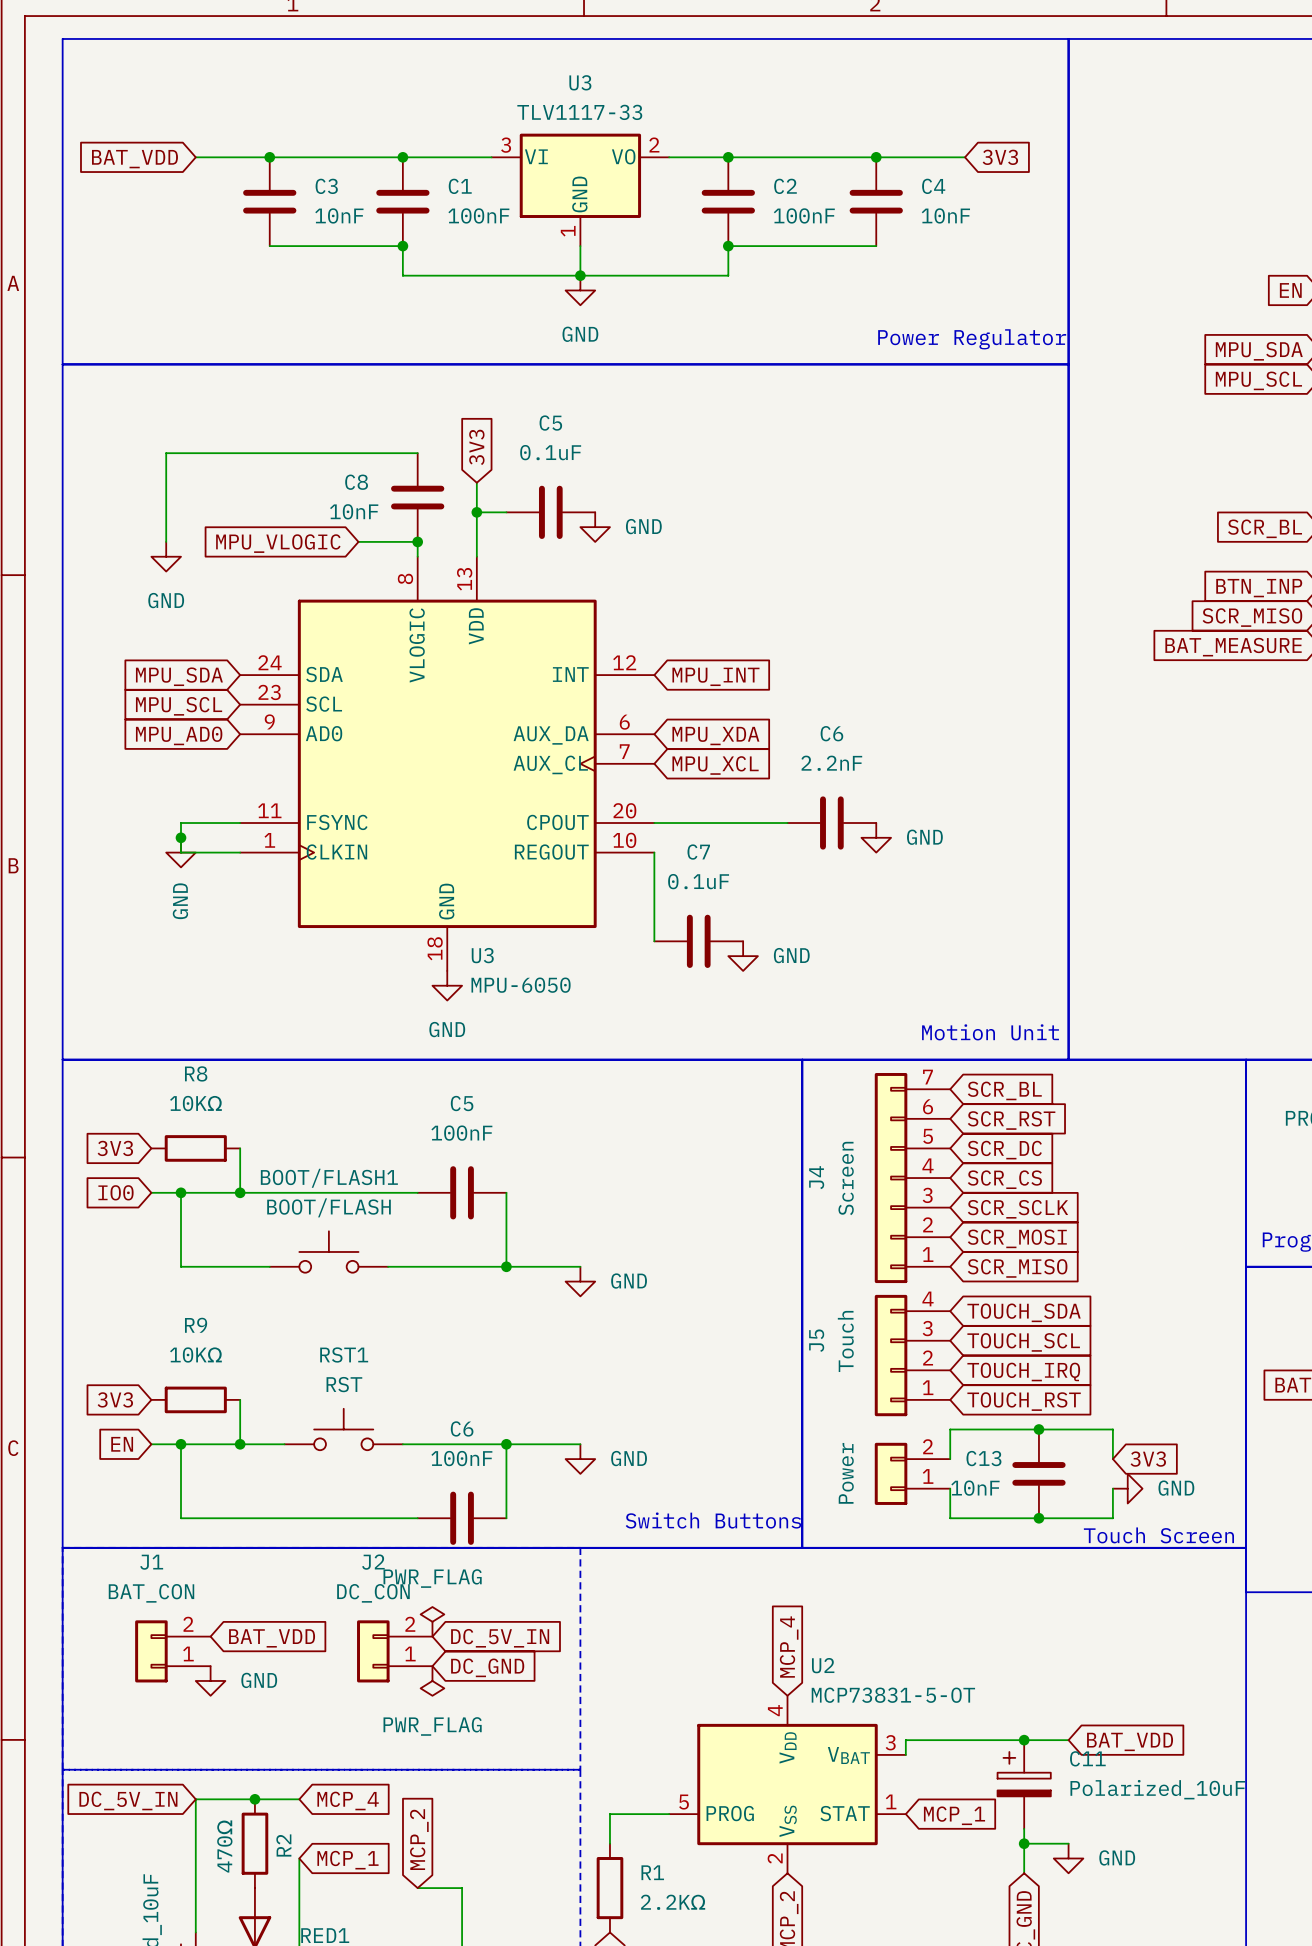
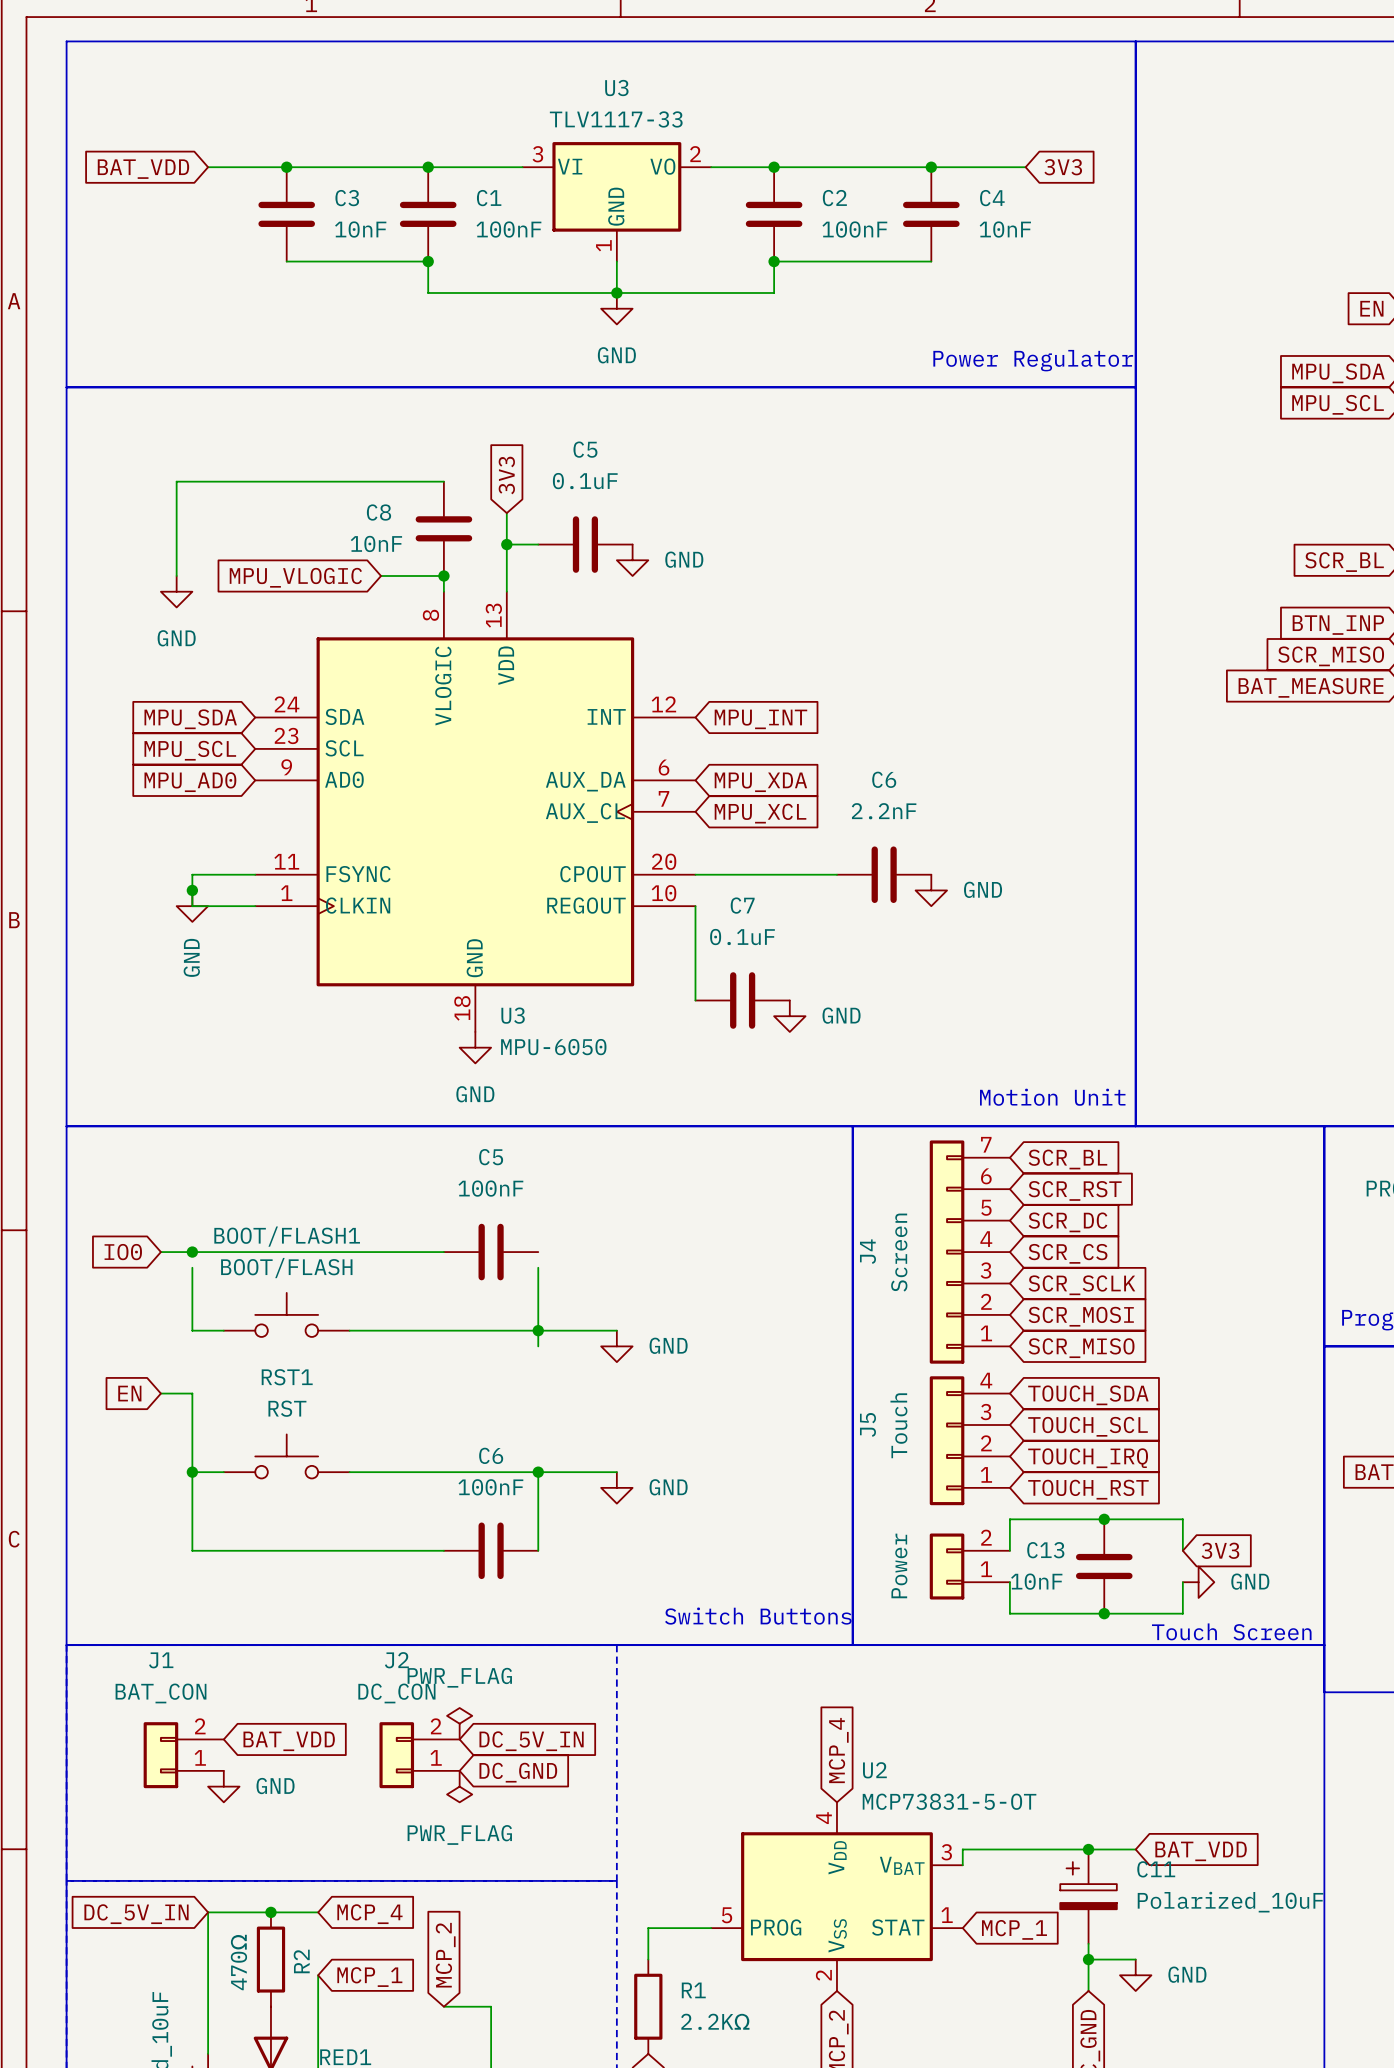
global label: 3V3 (115, 1148) -> none
R8: 10KΩ (195, 1148) -> none
wire: (240, 1148) (240, 1192) -> none
global label position: IO0 (115, 1192) -> IO0 (123, 1252)
wire: (151, 1192) (417, 1192) -> (160, 1252) (443, 1252)
junction position: (180, 1192) -> (192, 1252)
junction: (240, 1192) -> none
C5 position: (462, 1192) -> (491, 1252)
wire: (180, 1251) (180, 1266) (269, 1266) -> (192, 1330) (223, 1330)
wire: none -> (349, 1330) (616, 1330)
BOOT/FLASH1 position: (328, 1251) -> (286, 1314)
wire: (388, 1266) (580, 1266) -> none
junction position: (506, 1266) -> (538, 1330)
power symbol position: GND (580, 1281) -> GND (616, 1346)
wire: none -> (160, 1393) (192, 1393) (192, 1535)
wire: none -> (192, 1472) (223, 1472)
junction: none -> (192, 1472)
wire: none -> (349, 1472) (616, 1472)
junction: none -> (538, 1472)
global label: 3V3 (115, 1399) -> none
R9: 10KΩ (195, 1399) -> none
wire: (240, 1399) (240, 1444) -> none
power symbol: none -> GND (616, 1487)
RST1 position: (343, 1429) -> (286, 1456)
global label position: EN (122, 1444) -> EN (129, 1393)
wire: (151, 1444) (284, 1444) -> none
junction: (180, 1444) -> none
junction: (240, 1444) -> none
wire: (402, 1444) (580, 1444) -> none
junction: (506, 1444) -> none
wire: (180, 1459) (180, 1518) (417, 1518) -> (192, 1550) (443, 1550)
wire: (506, 1459) (506, 1518) -> (538, 1472) (538, 1535)
power symbol: GND (580, 1459) -> none
C6 position: (462, 1518) -> (491, 1550)

